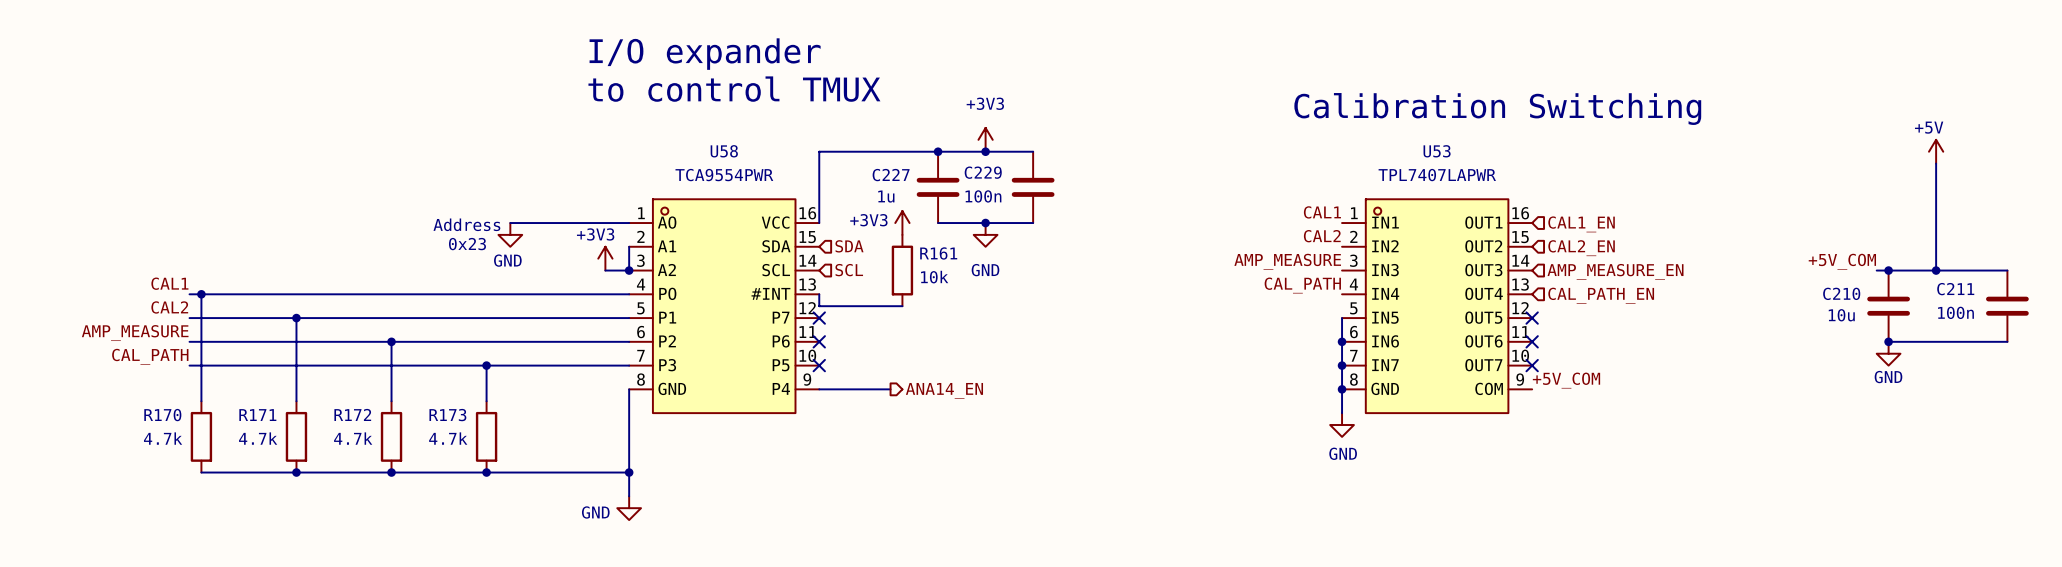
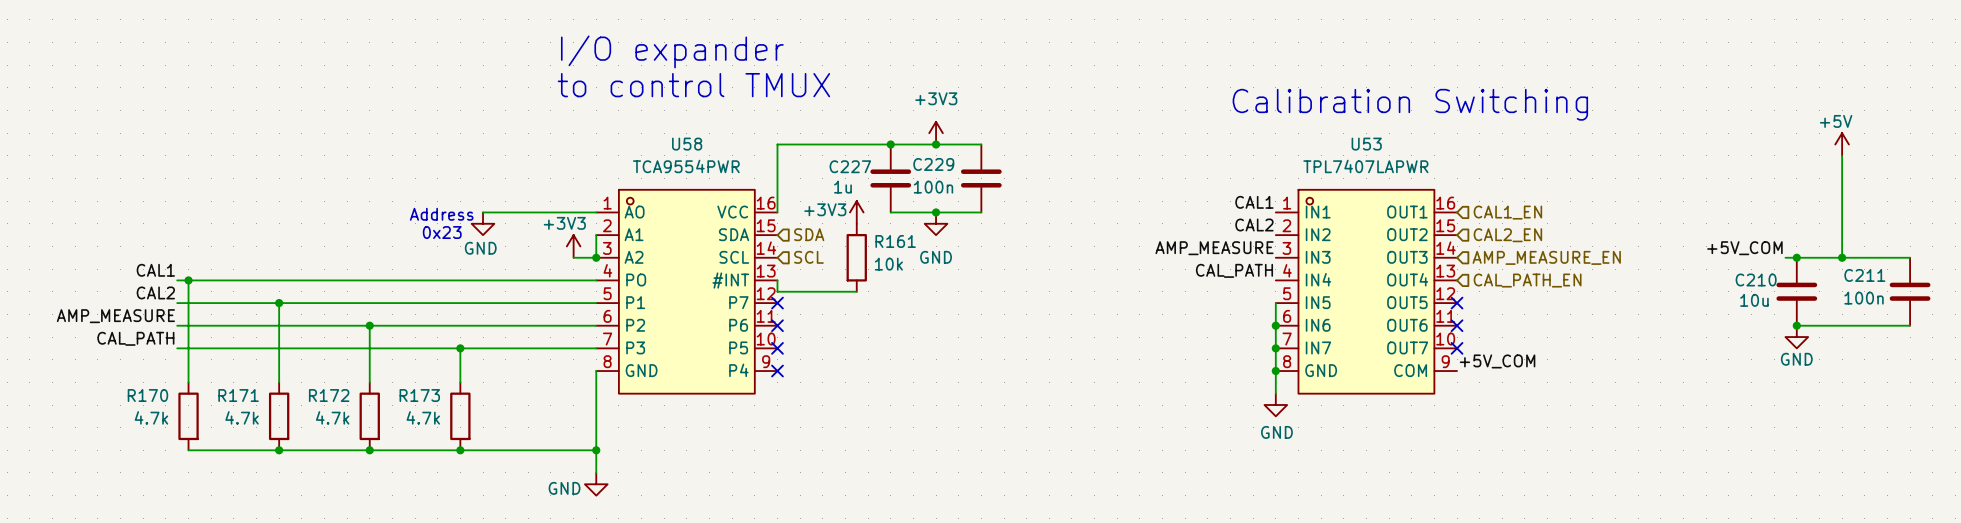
wire: (819, 389) (890, 389) -> none
no-connect mark: none -> (777, 371)
hierarchical label: ANA14_EN (944, 390) -> none

